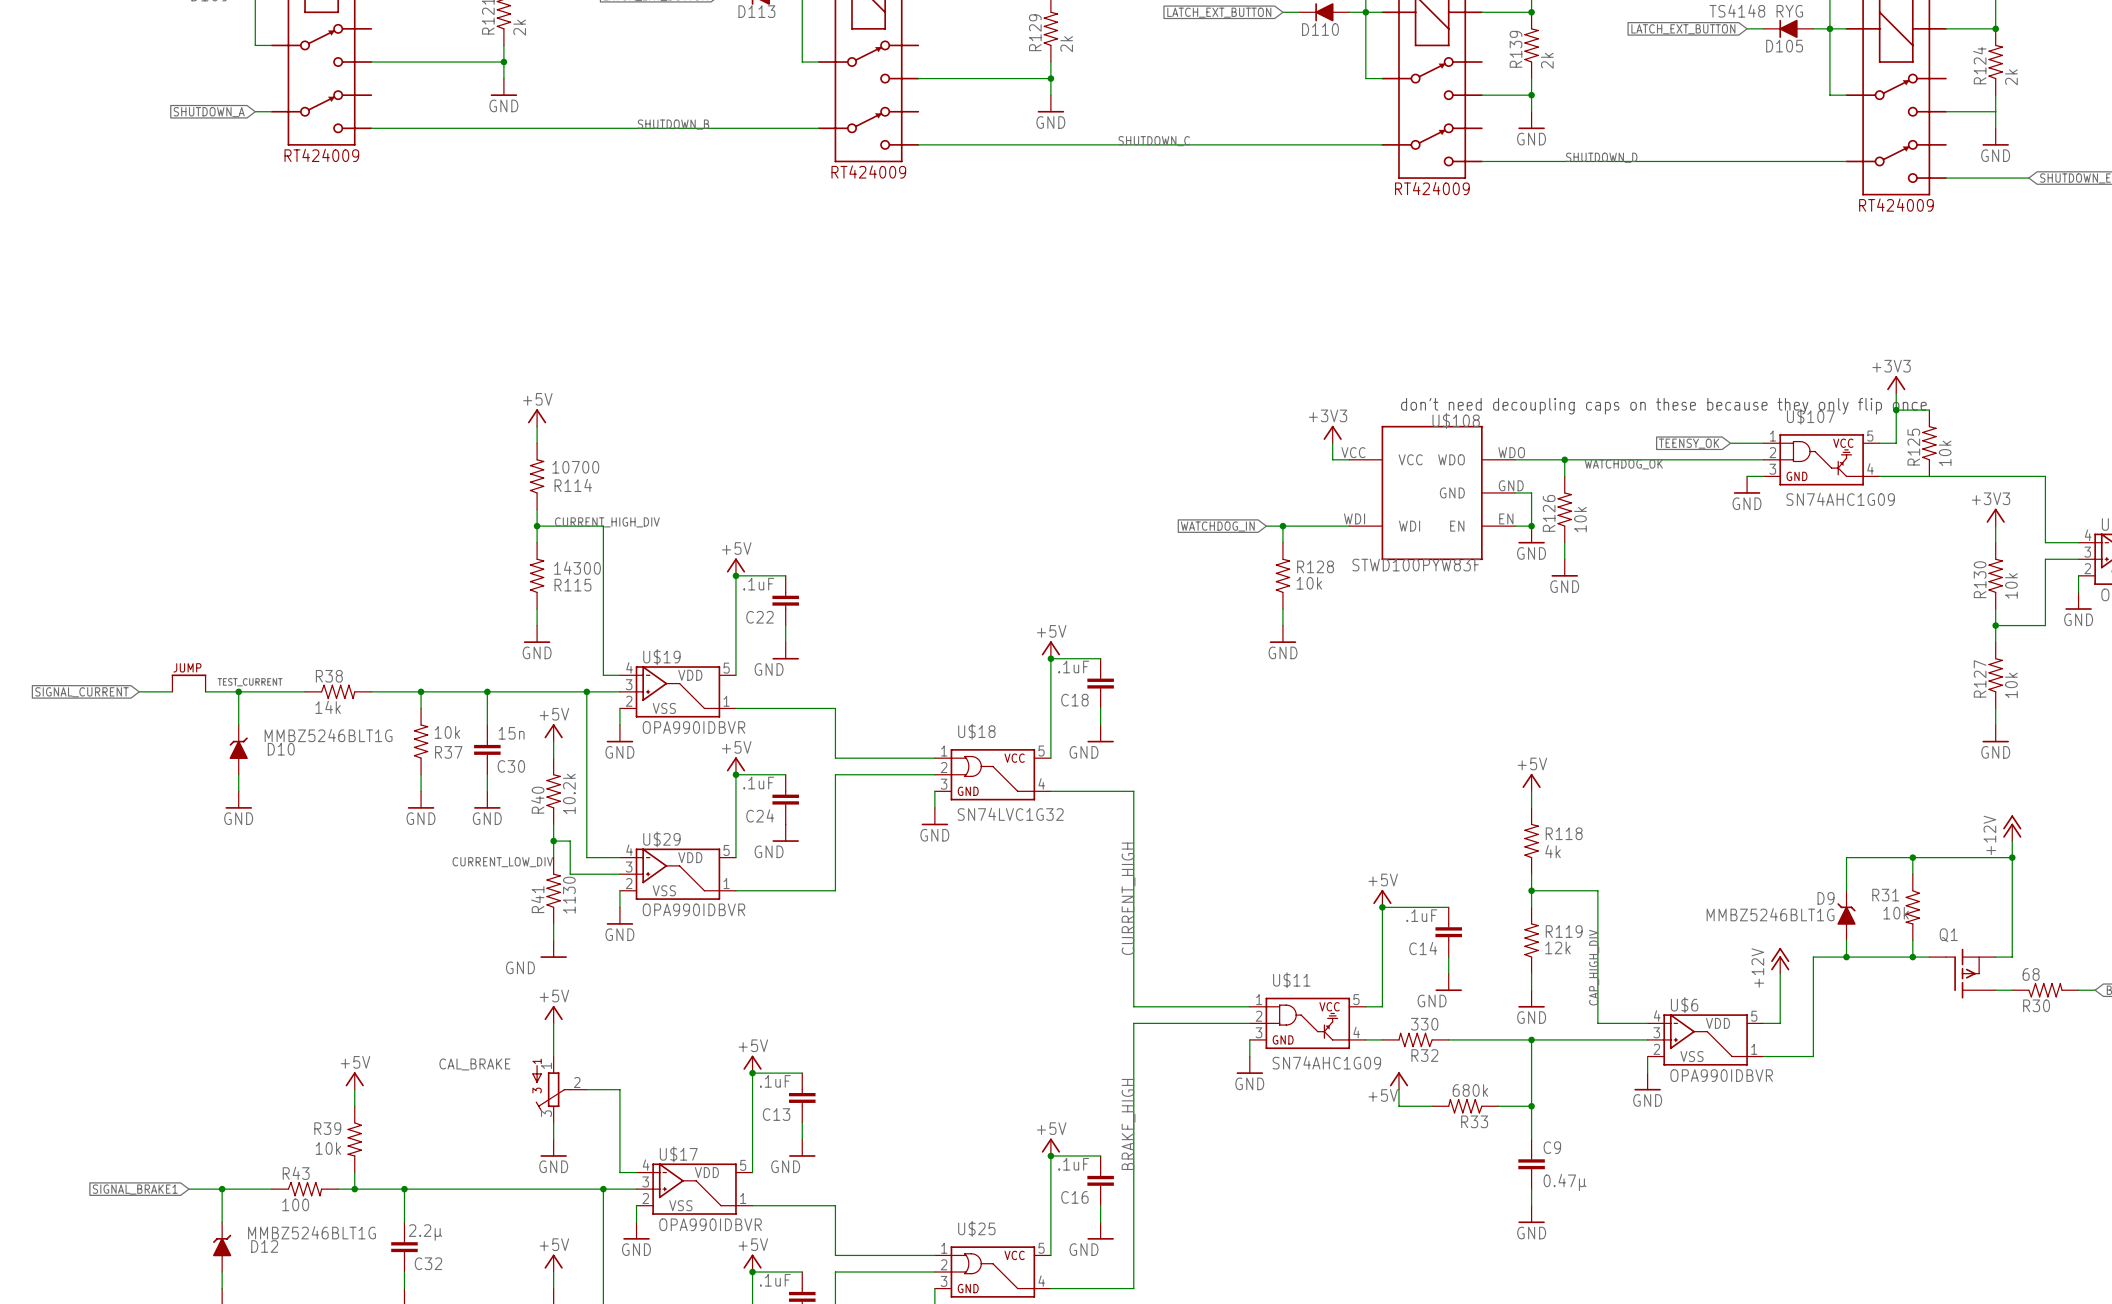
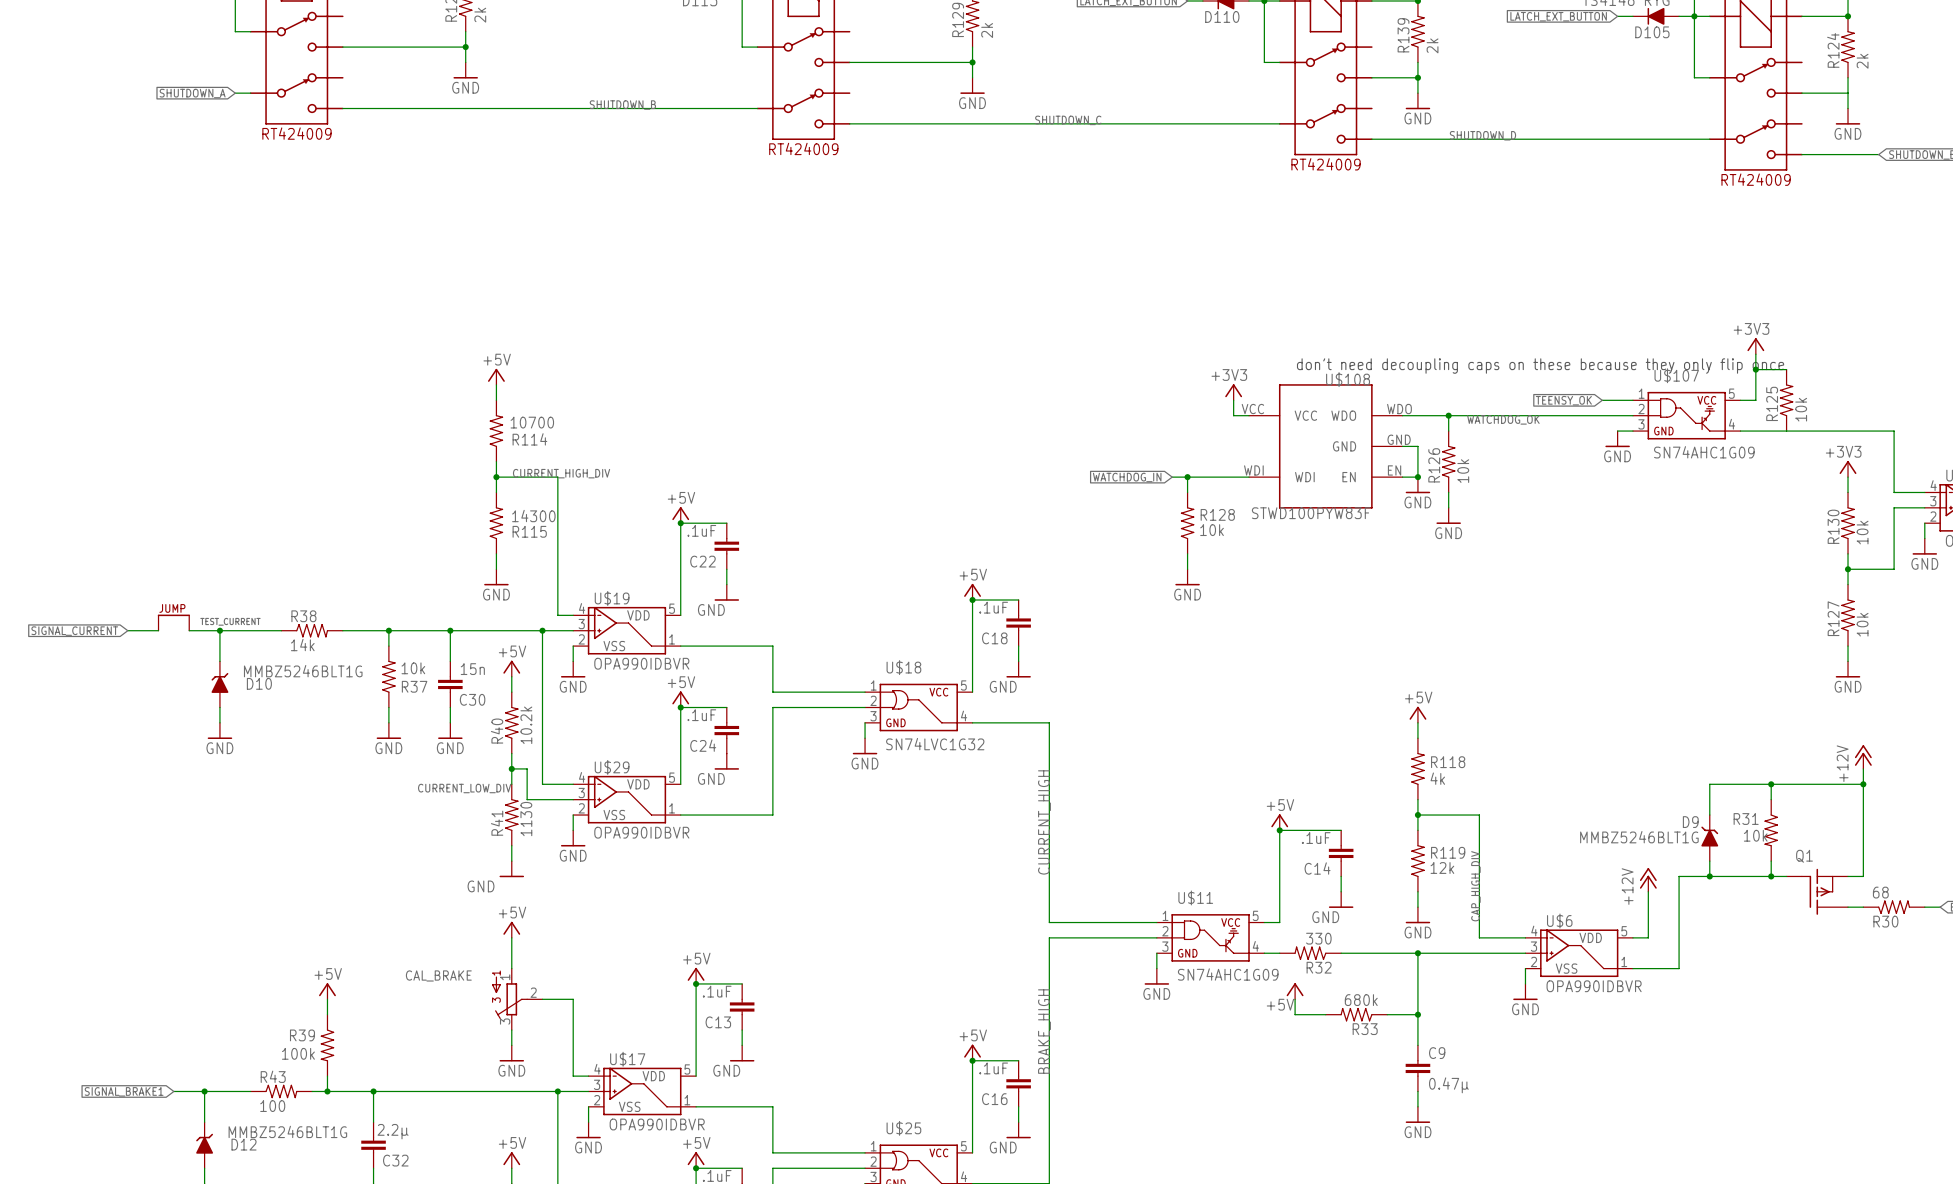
R39 value: 10k (328, 1148) -> 100k (298, 1053)

